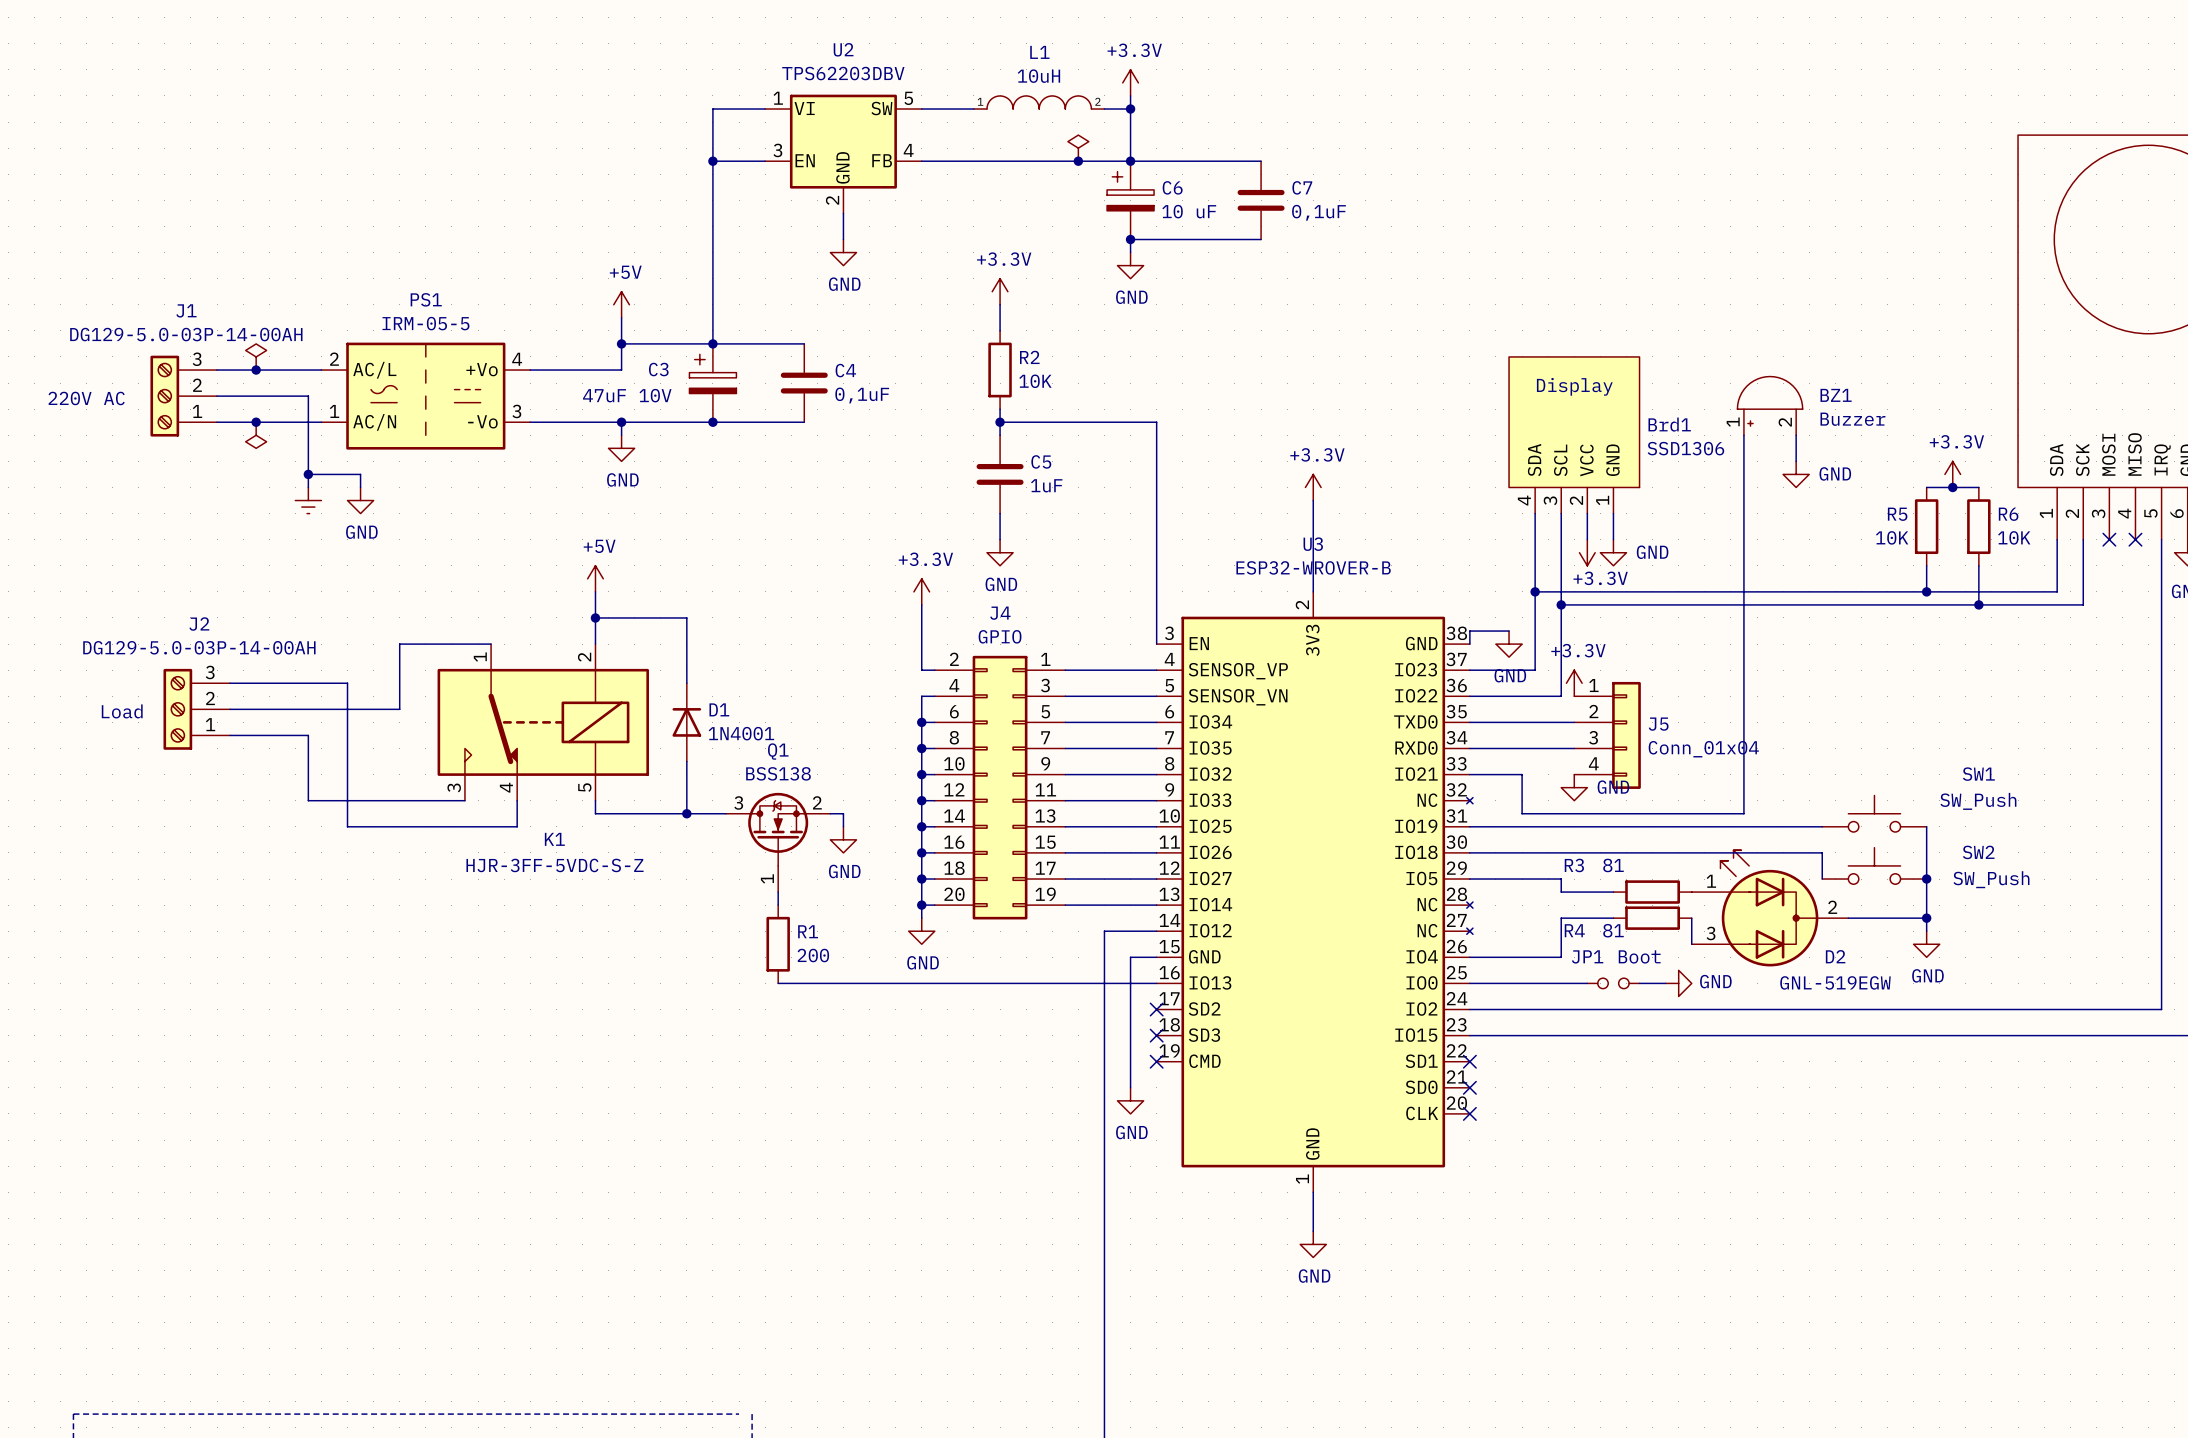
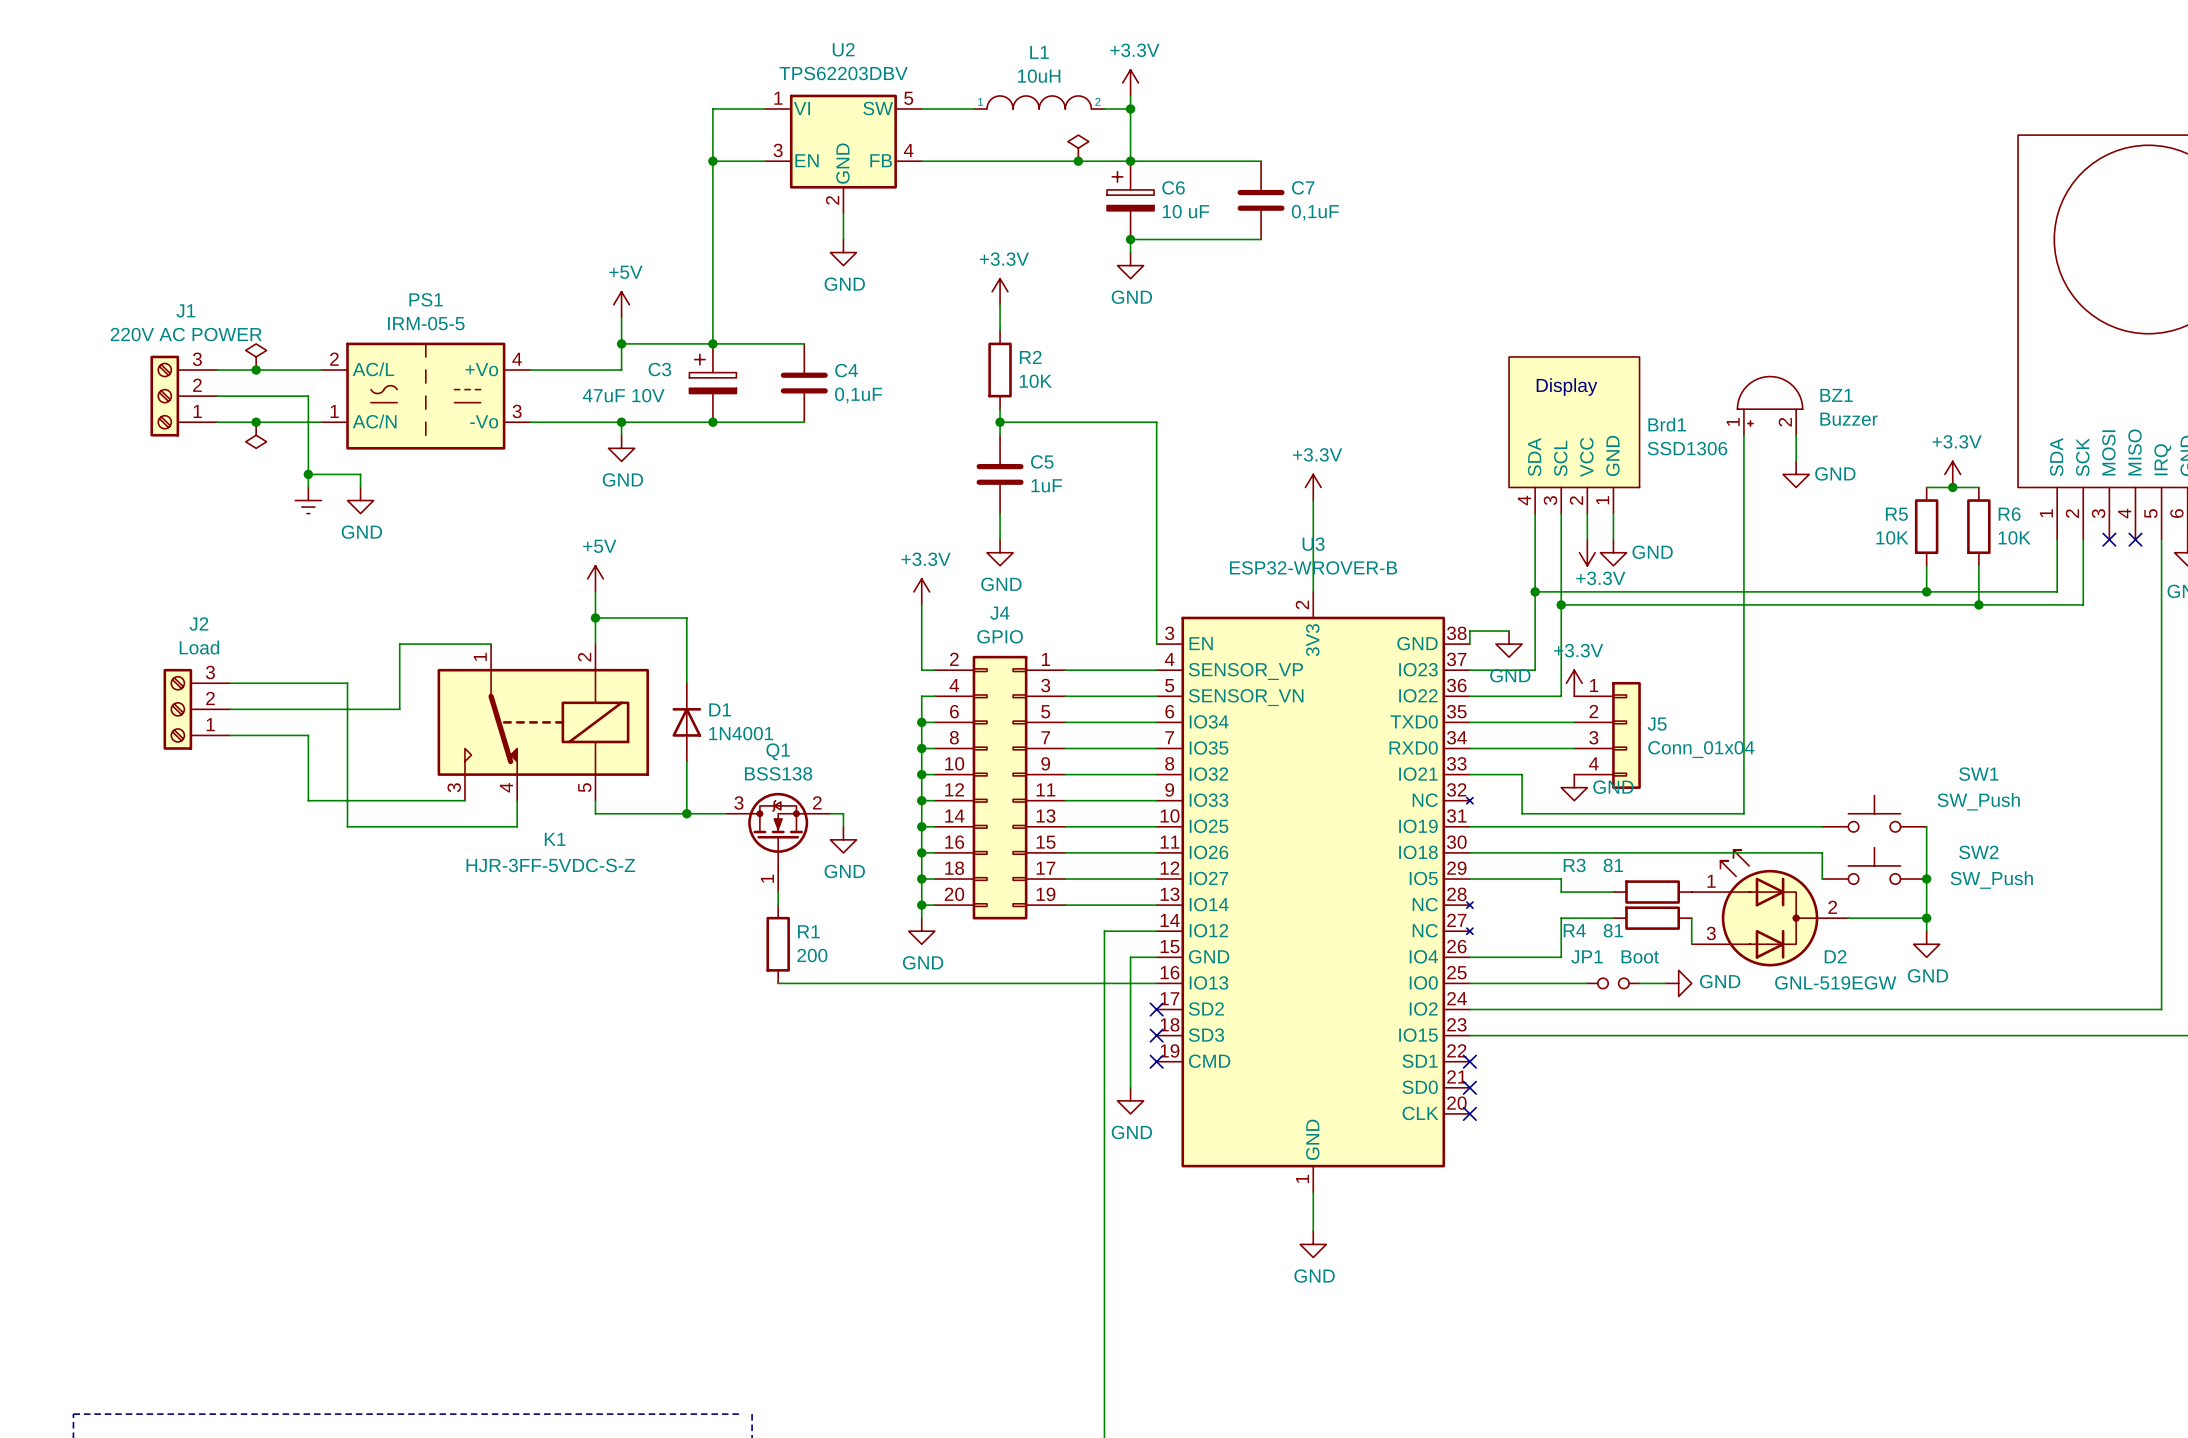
J1 value: DG129-5.0-03P-14-00AH (186, 334) -> 220V AC POWER (186, 334)
text: 220V AC (86, 398) -> none
J2 value: DG129-5.0-03P-14-00AH (199, 647) -> Load (199, 647)
text: Load (122, 711) -> none

